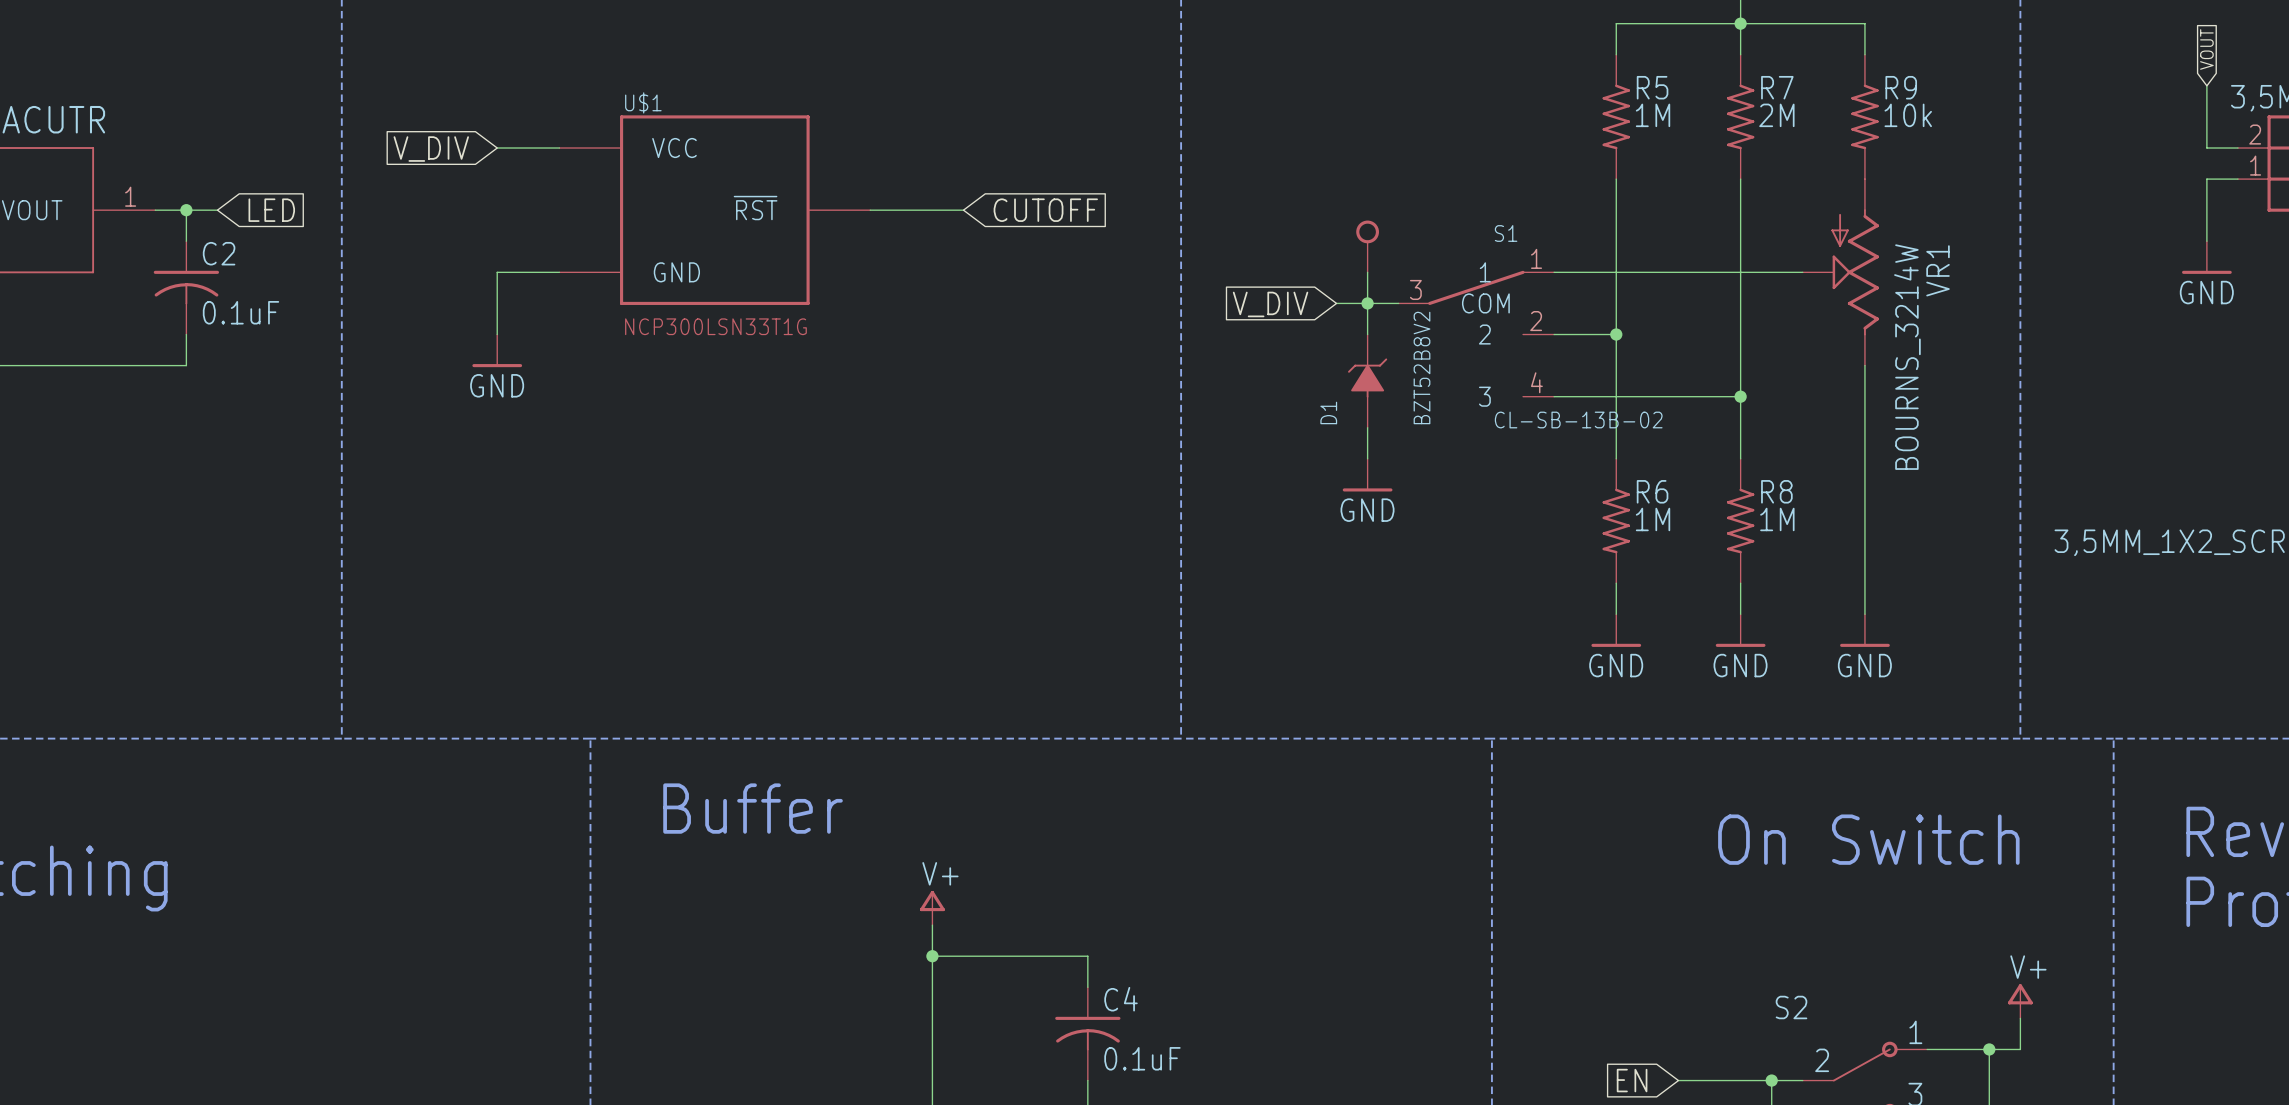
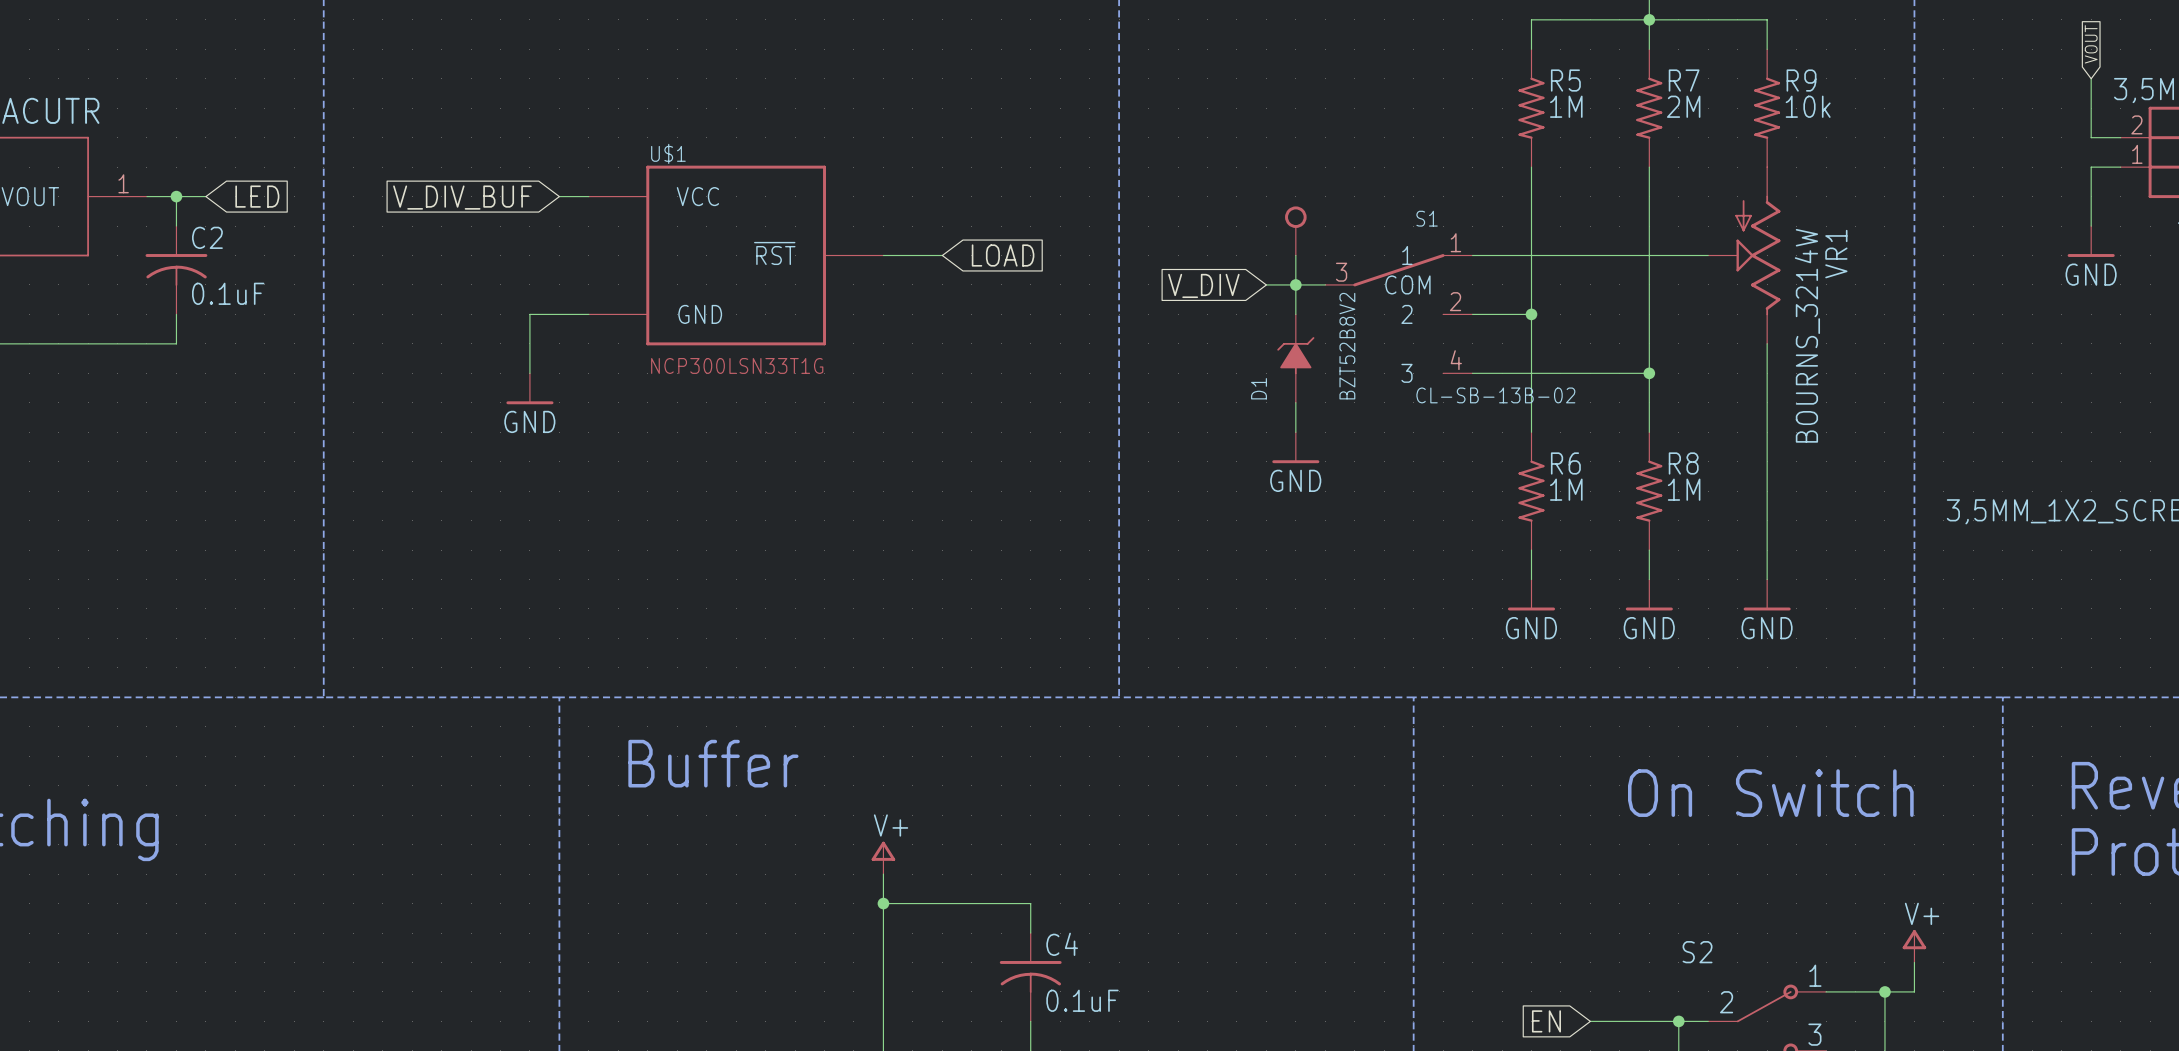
wire: (497, 148) (559, 148) -> none
global label: V_DIV (431, 149) -> none
wire: none -> (559, 196) (588, 196)
U$1 position: (714, 210) -> (736, 255)
wire: (870, 210) (963, 210) -> none
global label: CUTOFF (1045, 210) -> none
global label: none -> V_DIV_BUF (462, 197)
wire: (559, 272) (497, 272) (497, 334) -> (588, 314) (529, 314) (529, 373)
wire: none -> (883, 255) (942, 255)
global label: none -> LOAD (1003, 255)
power symbol position: GND (497, 350) -> GND (529, 388)

